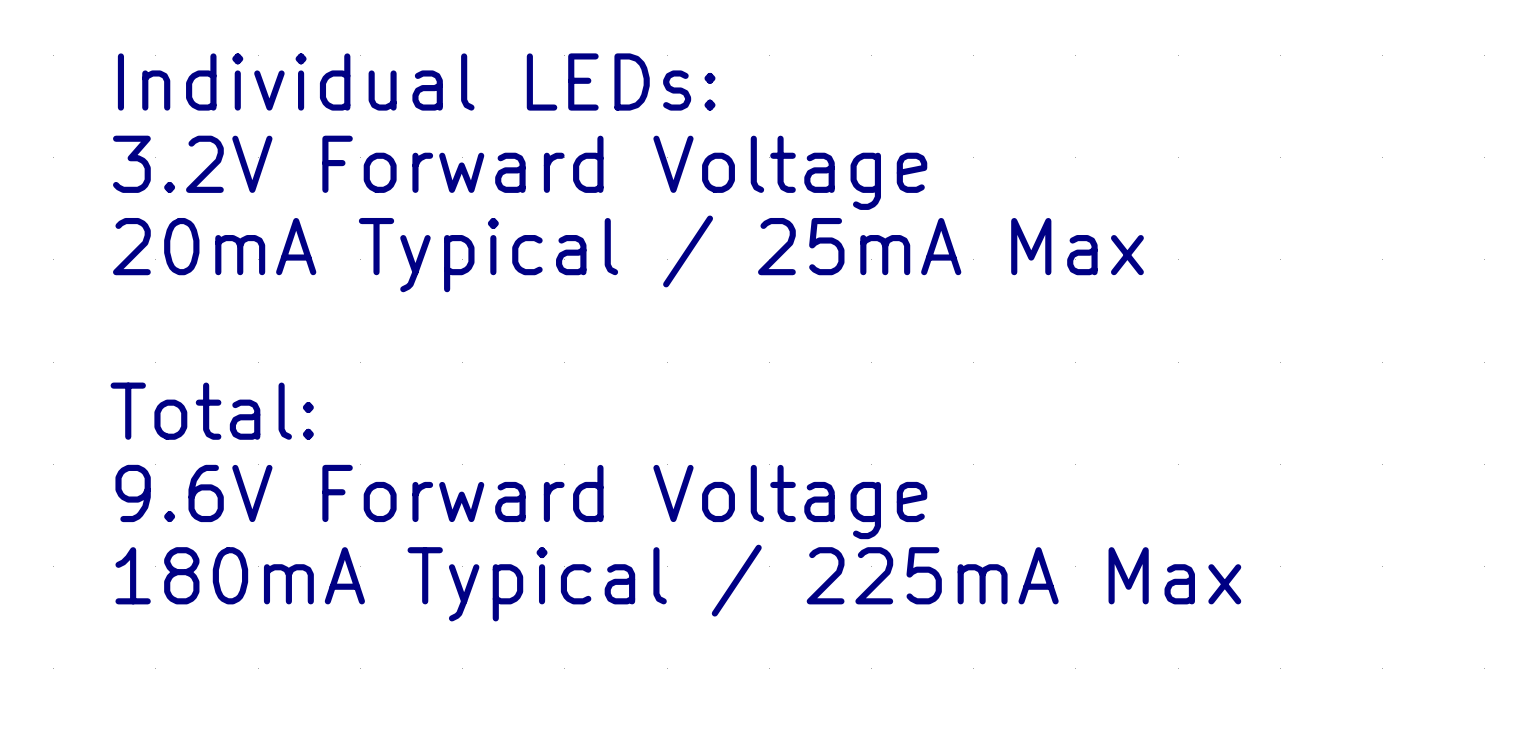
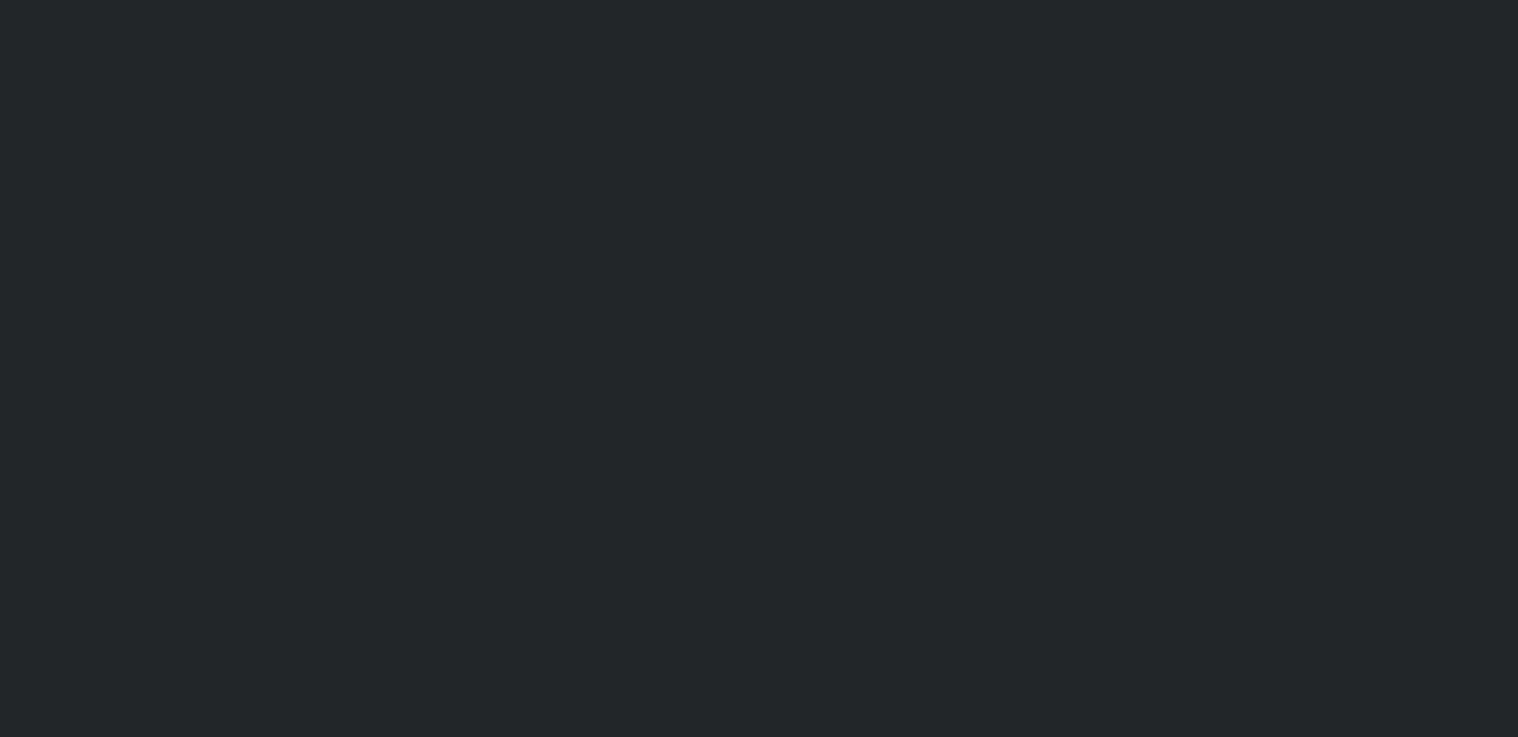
text: Individual LEDs: (416, 82) -> none
text: 3.2V Forward Voltage (520, 172) -> none
text: 20mA Typical / 25mA Max (628, 253) -> none
text: Total: (212, 411) -> none
text: 9.6V Forward Voltage (521, 501) -> none
text: 180mA Typical / 225mA Max (678, 583) -> none

